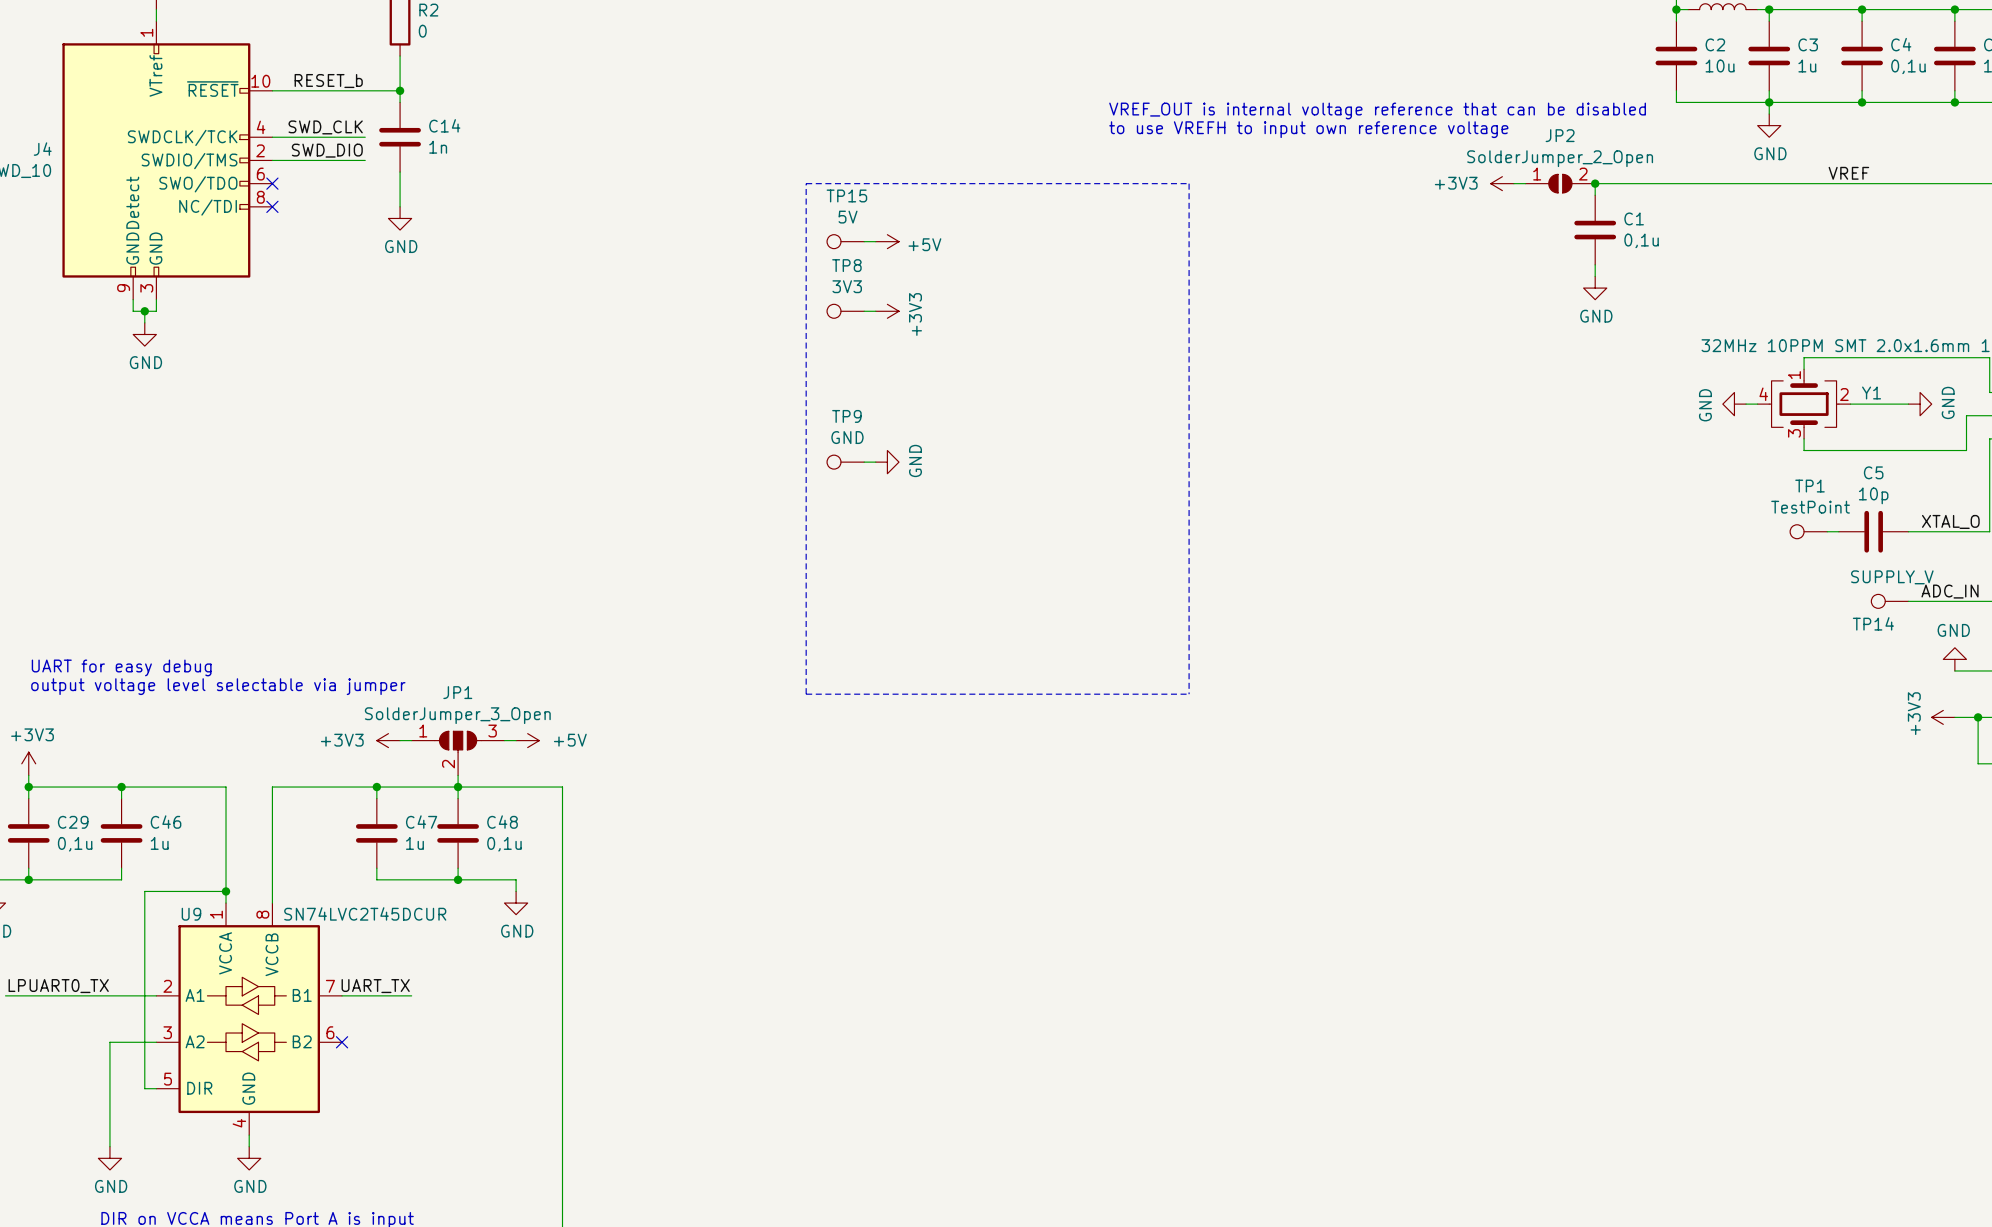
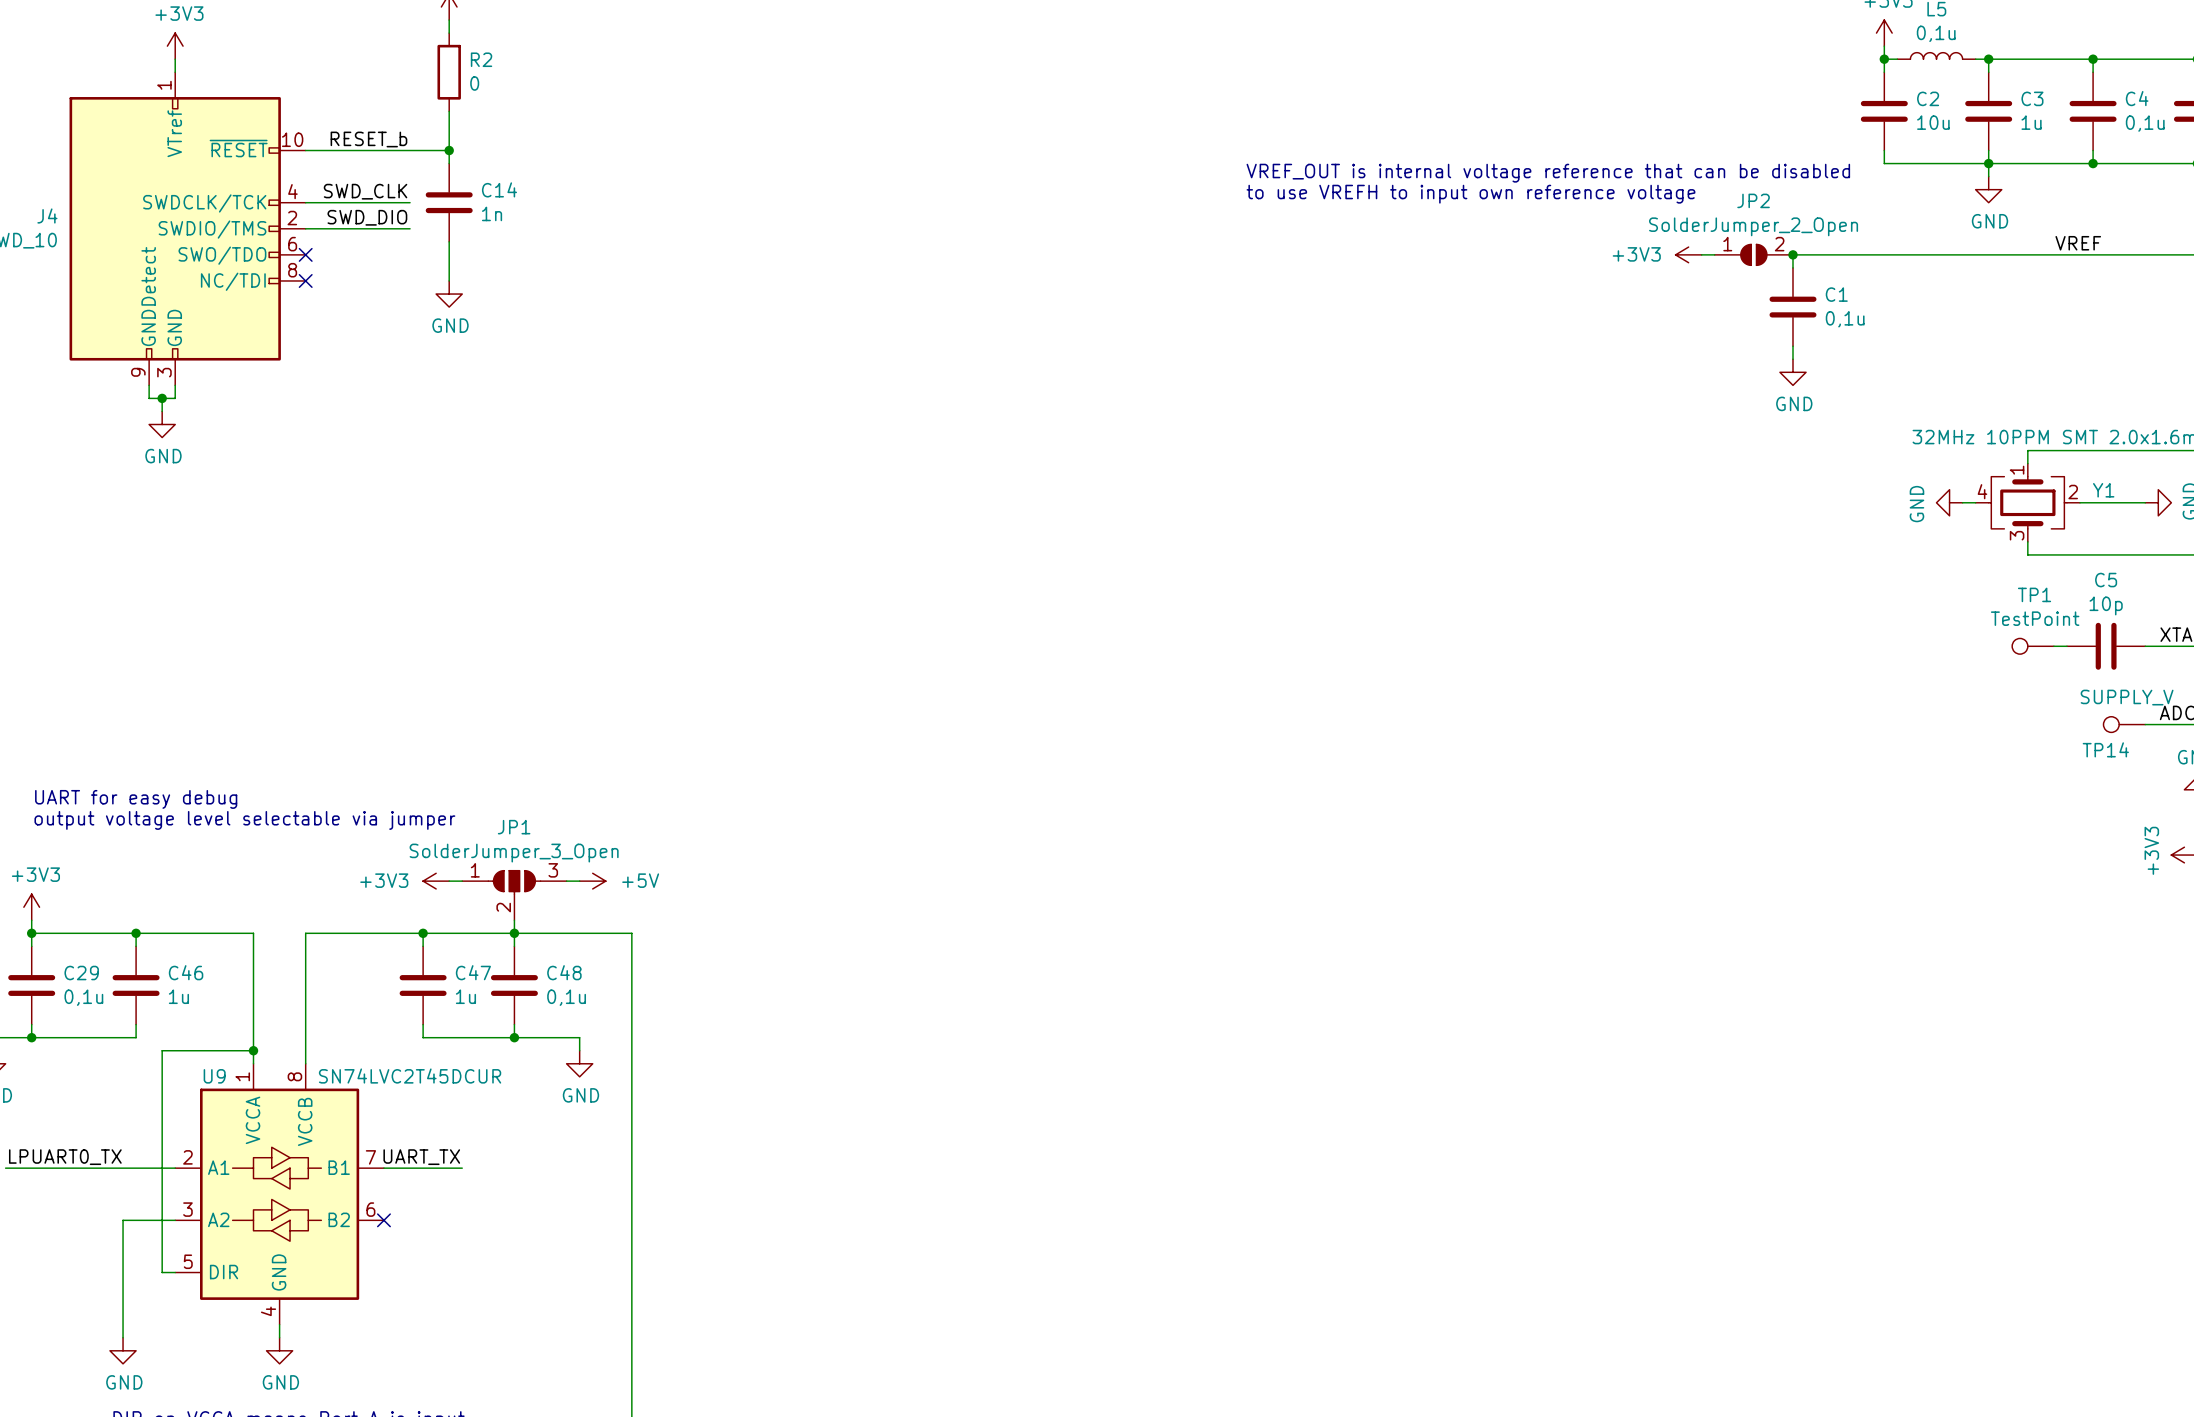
line: (806, 183) (806, 694) (1189, 694) (1189, 183) (806, 183) -> none
TP15: 5V (845, 241) -> none
wire: (864, 241) (875, 241) -> none
power symbol: +5V (887, 241) -> none
TP8: 3V3 (845, 311) -> none
wire: (864, 311) (875, 311) -> none
power symbol: +3V3 (887, 311) -> none
TP9: GND (845, 462) -> none
wire: (864, 462) (875, 462) -> none
power symbol: GND (887, 462) -> none

